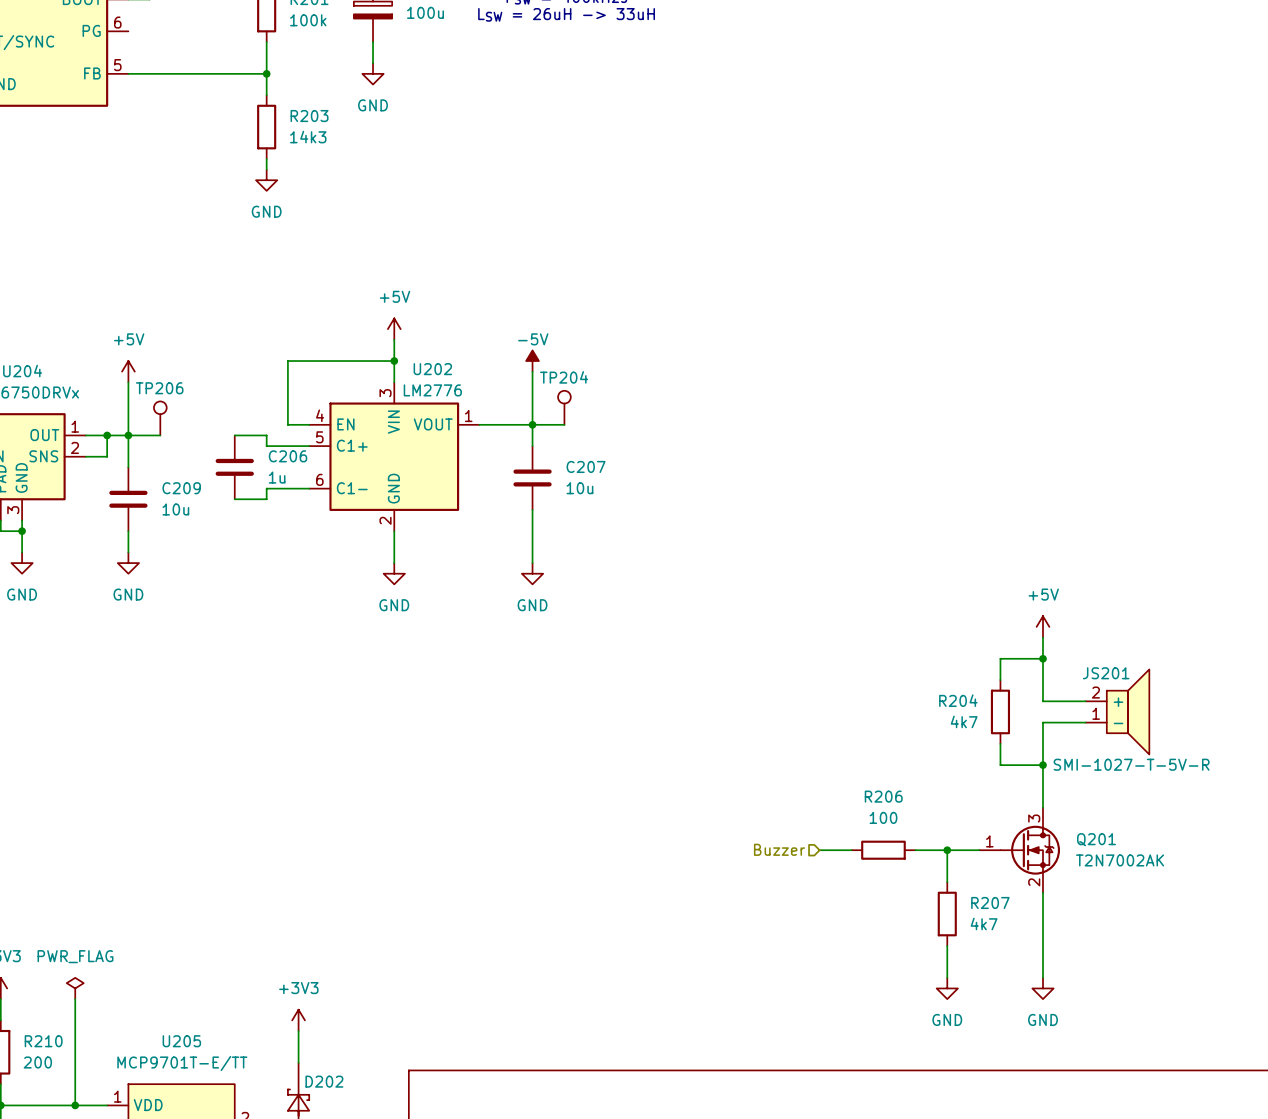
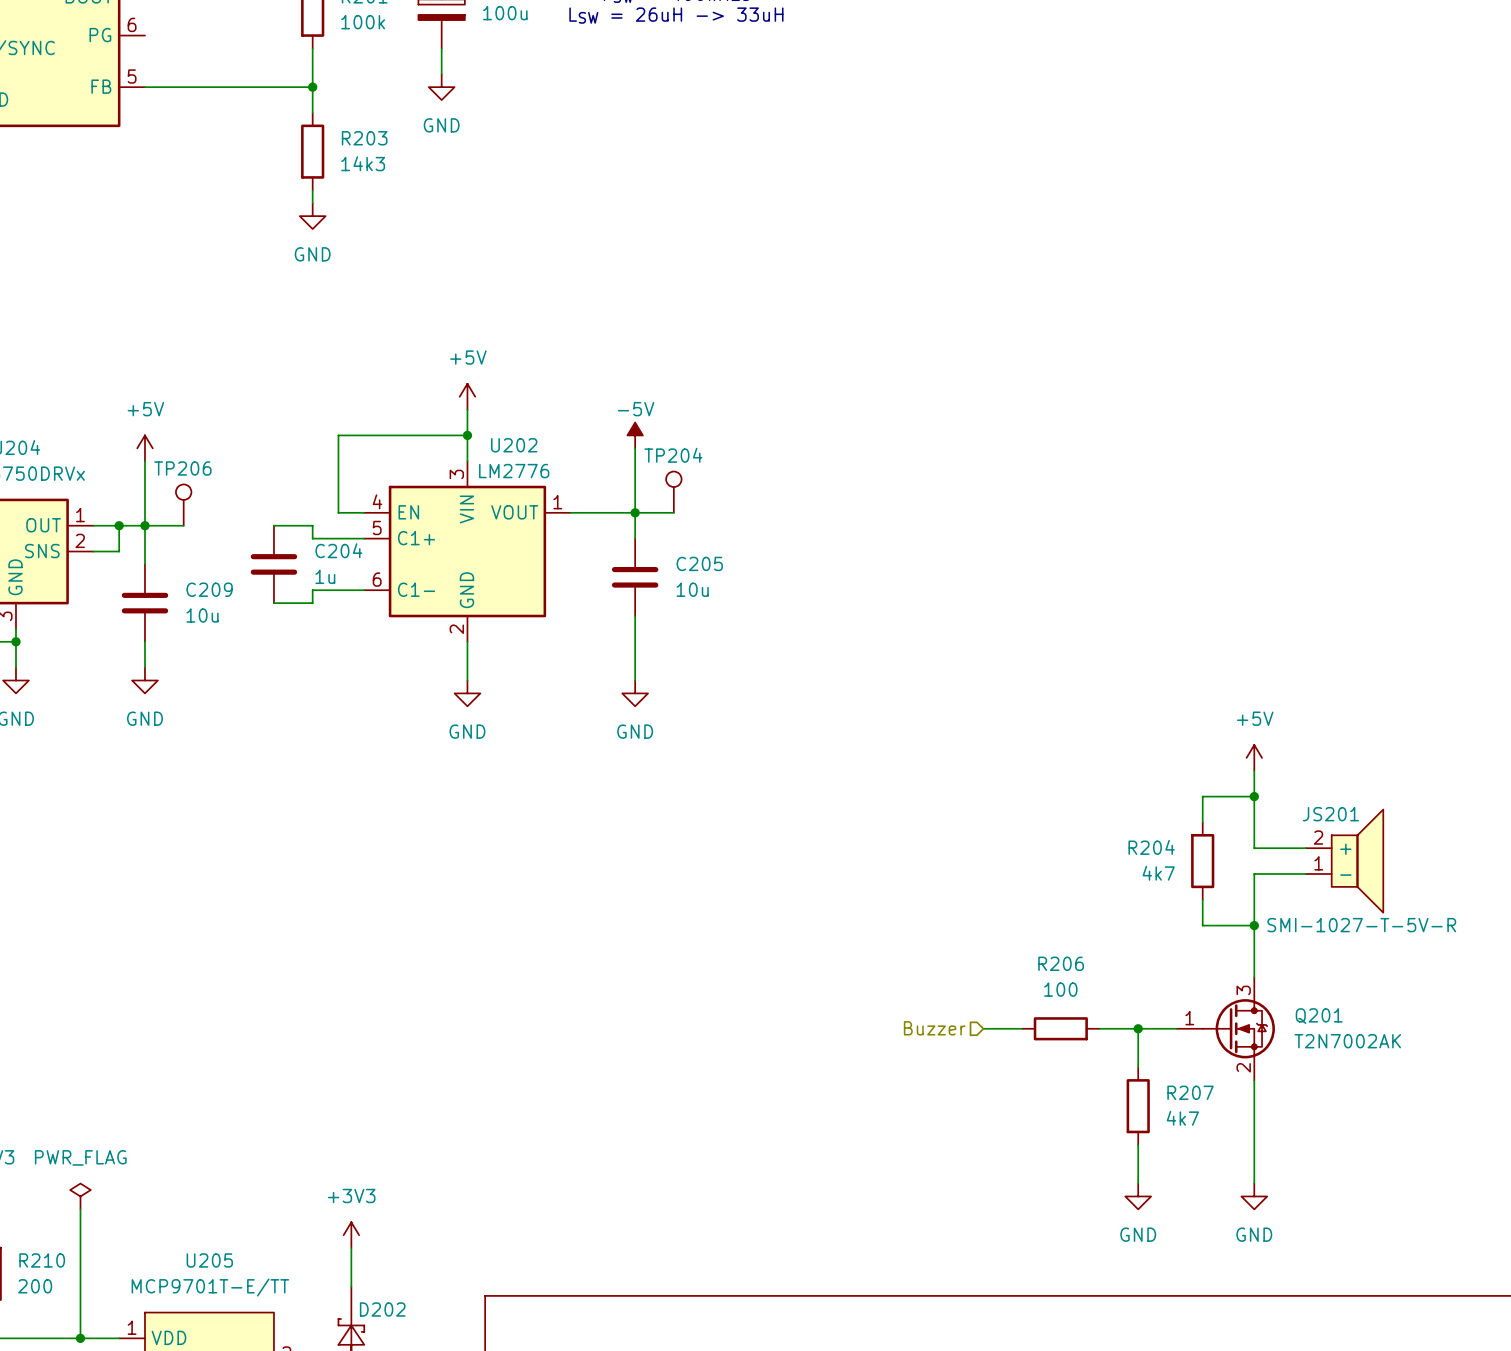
C206 name: C206 (288, 456) -> C204 (338, 550)
C207 name: C207 (586, 466) -> C205 (699, 563)

